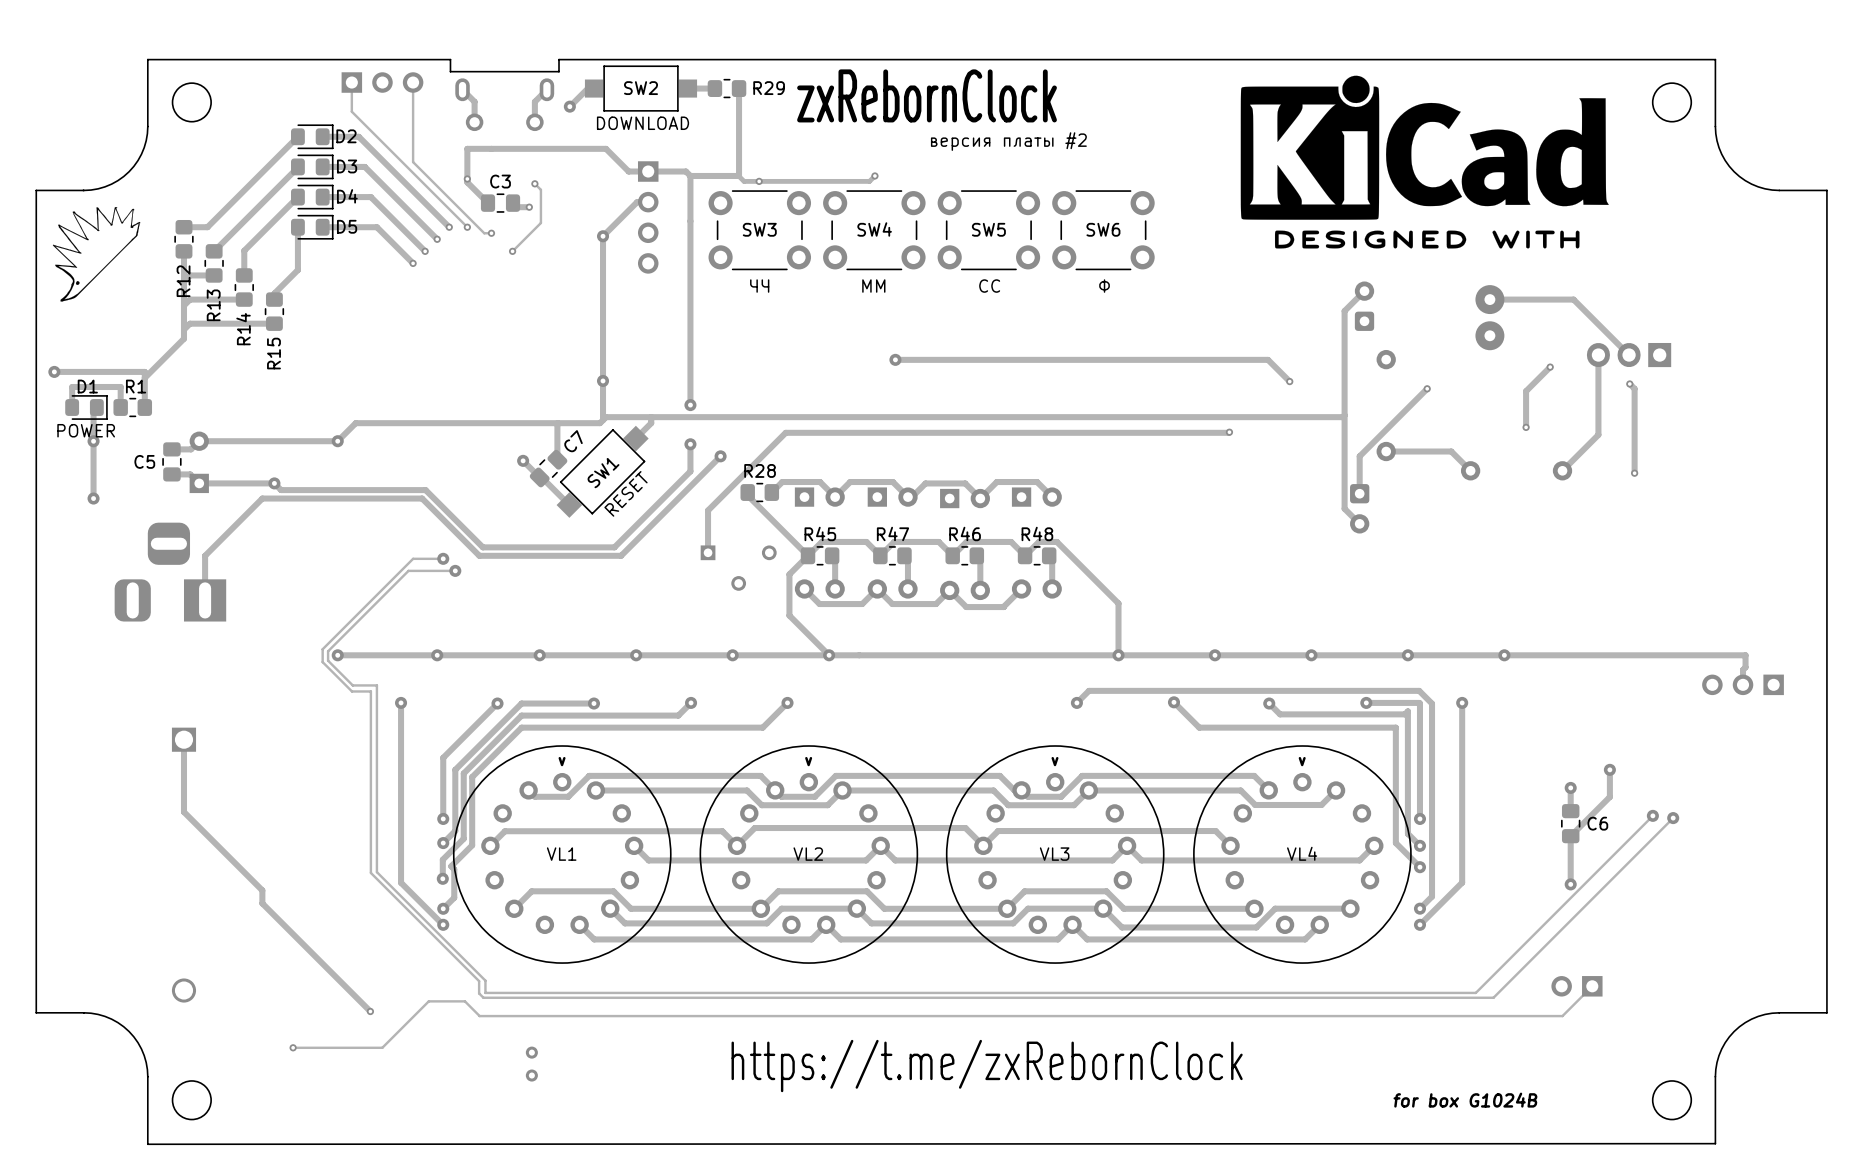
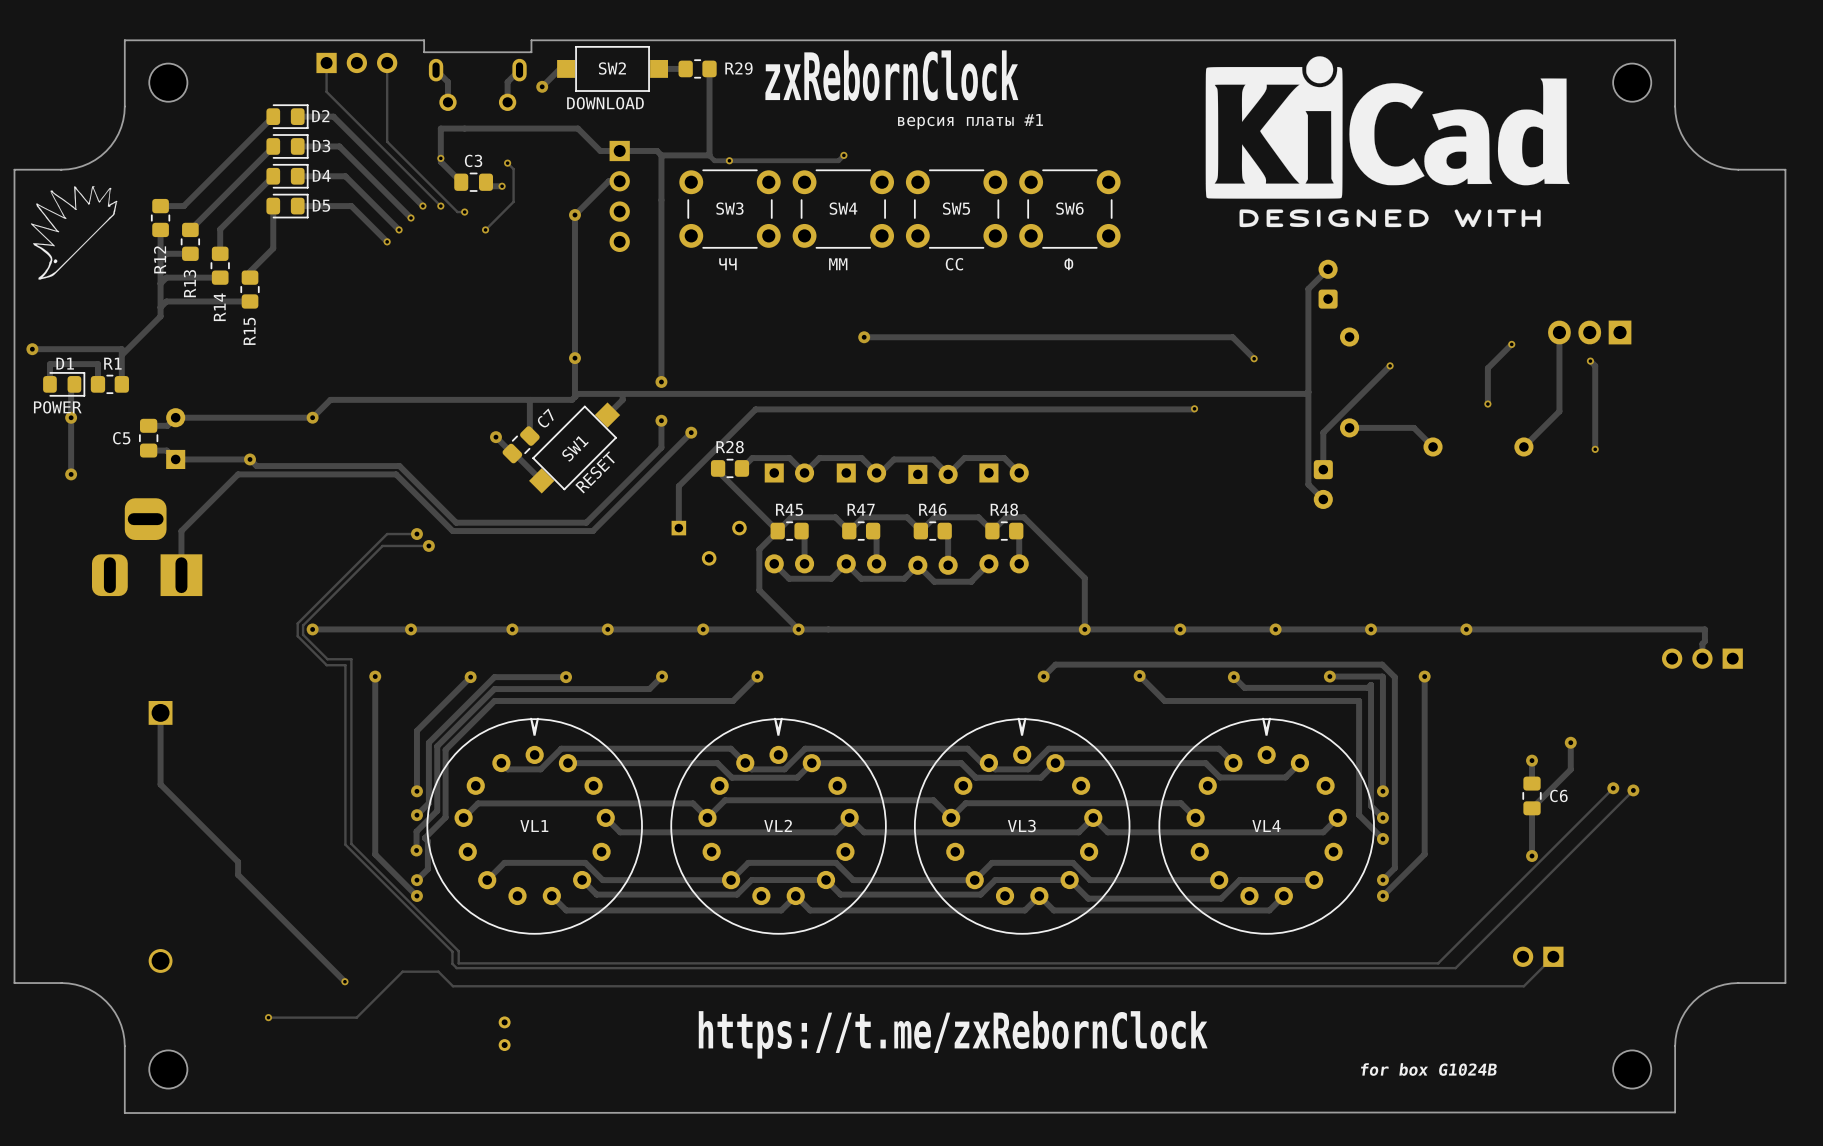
text: версия платы #2 (1008, 141) -> версия платы #1 (970, 121)
track: (1489, 299) (1573, 299) (1629, 355) -> none
part: (1489, 317) -> none

